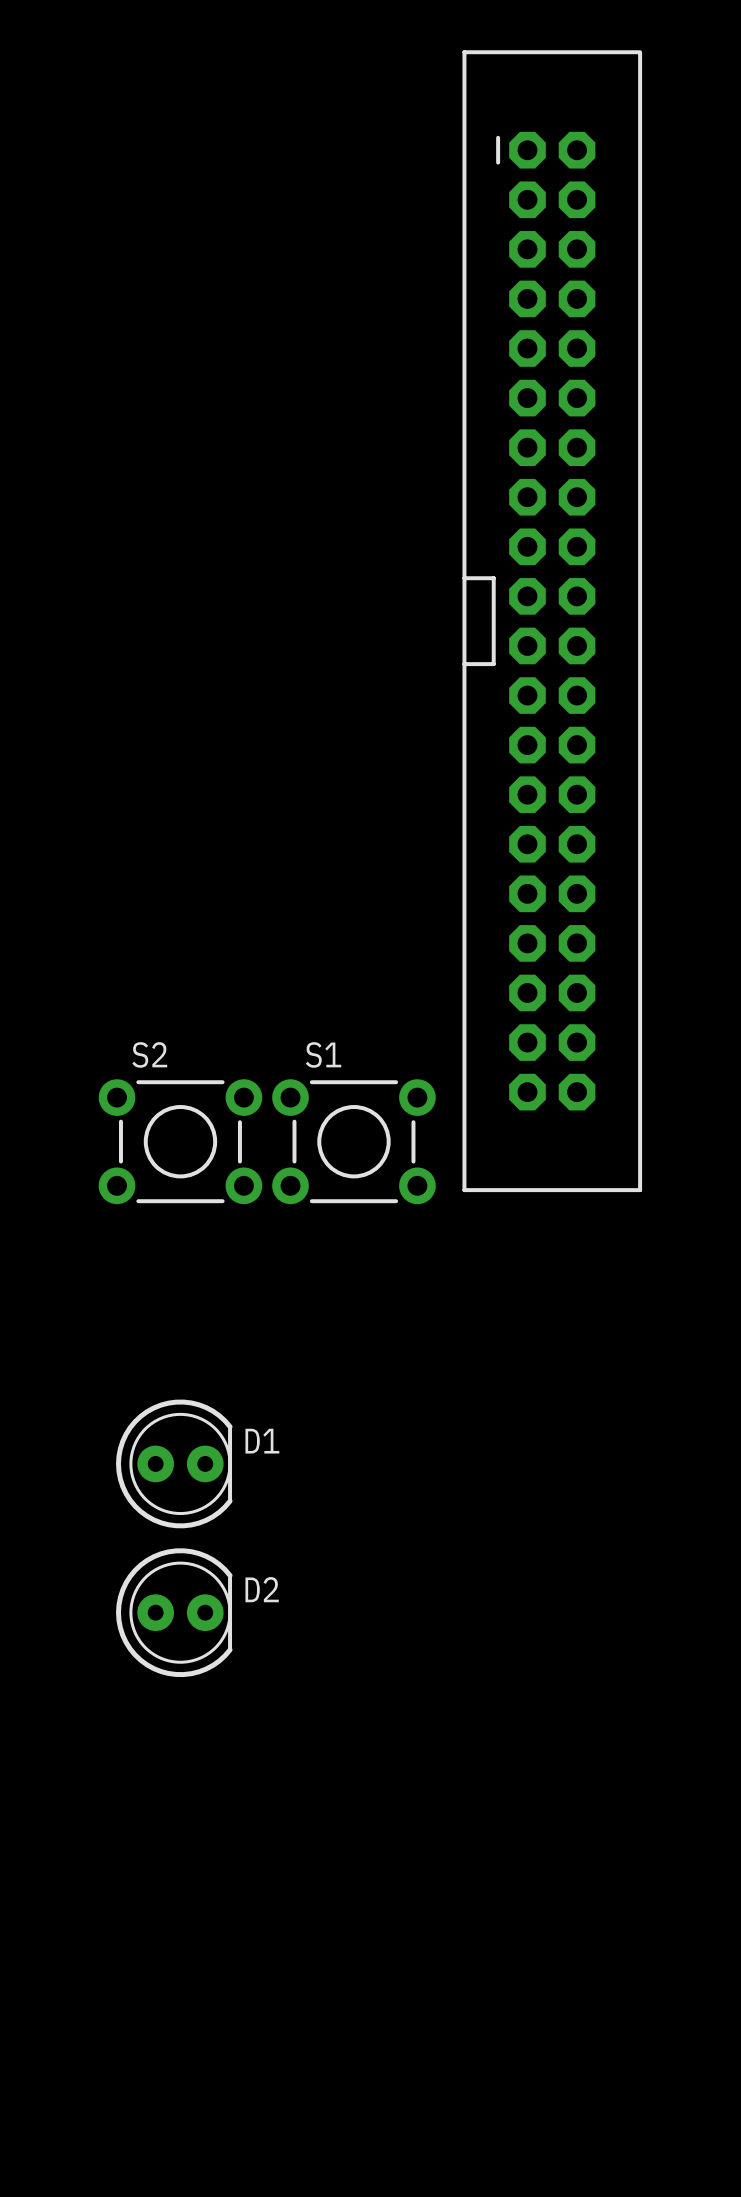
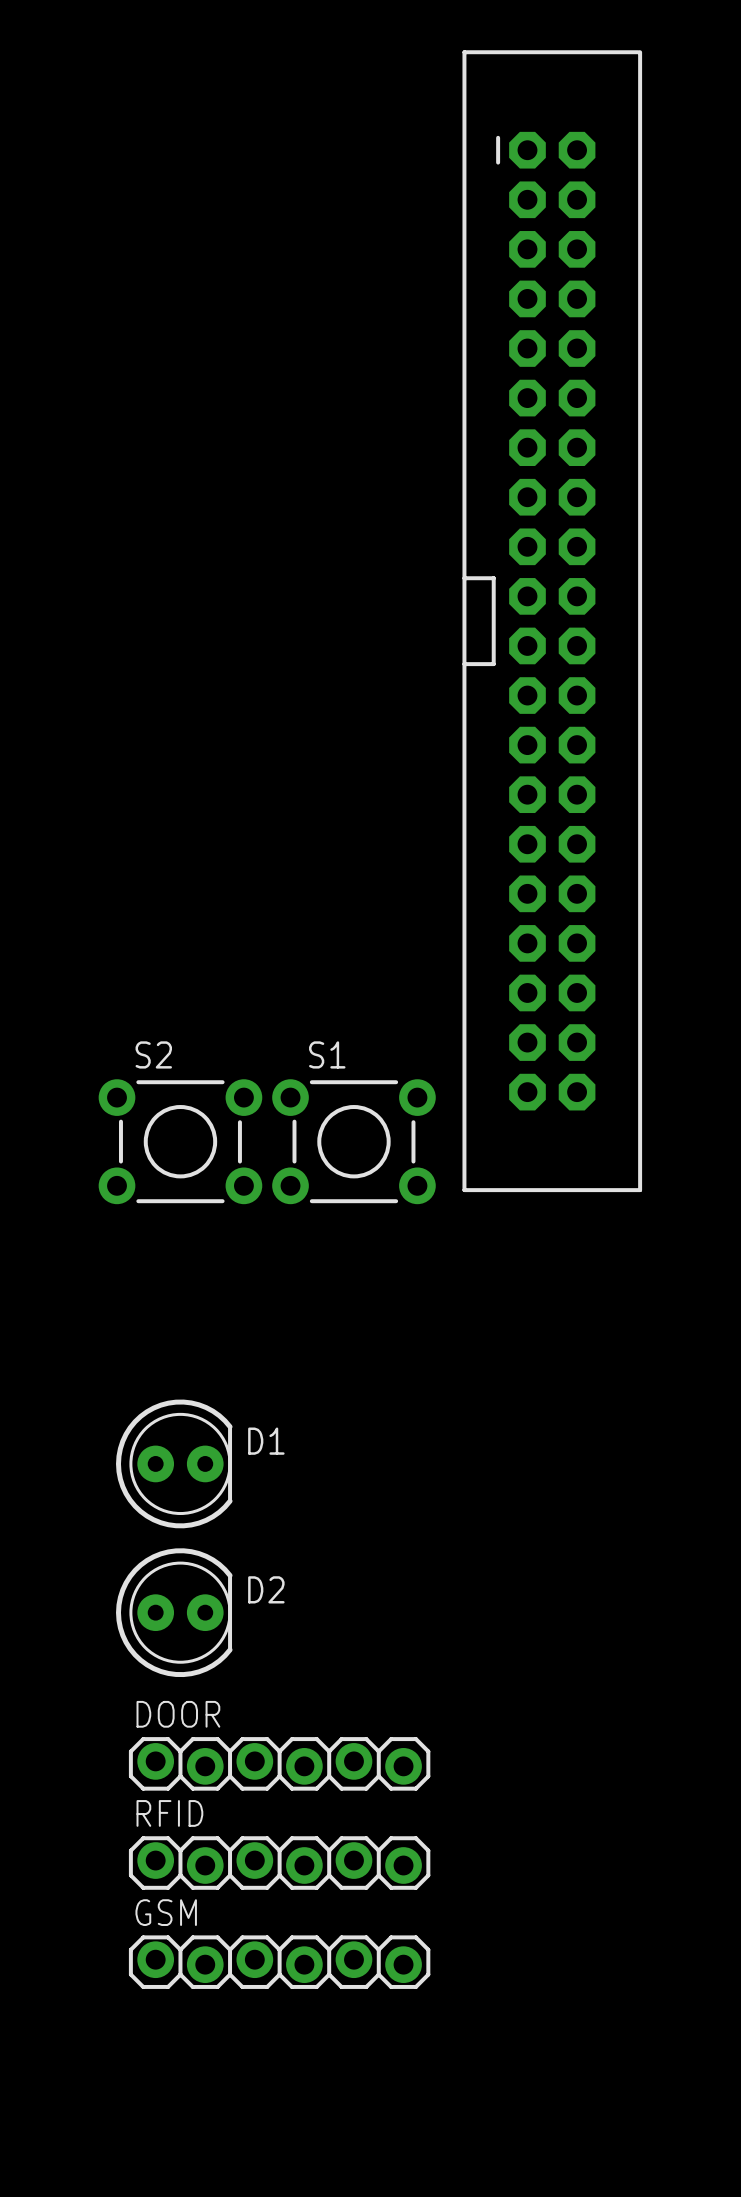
DOOR: none -> (279, 1763)
RFID: none -> (279, 1863)
GSM: none -> (279, 1962)

